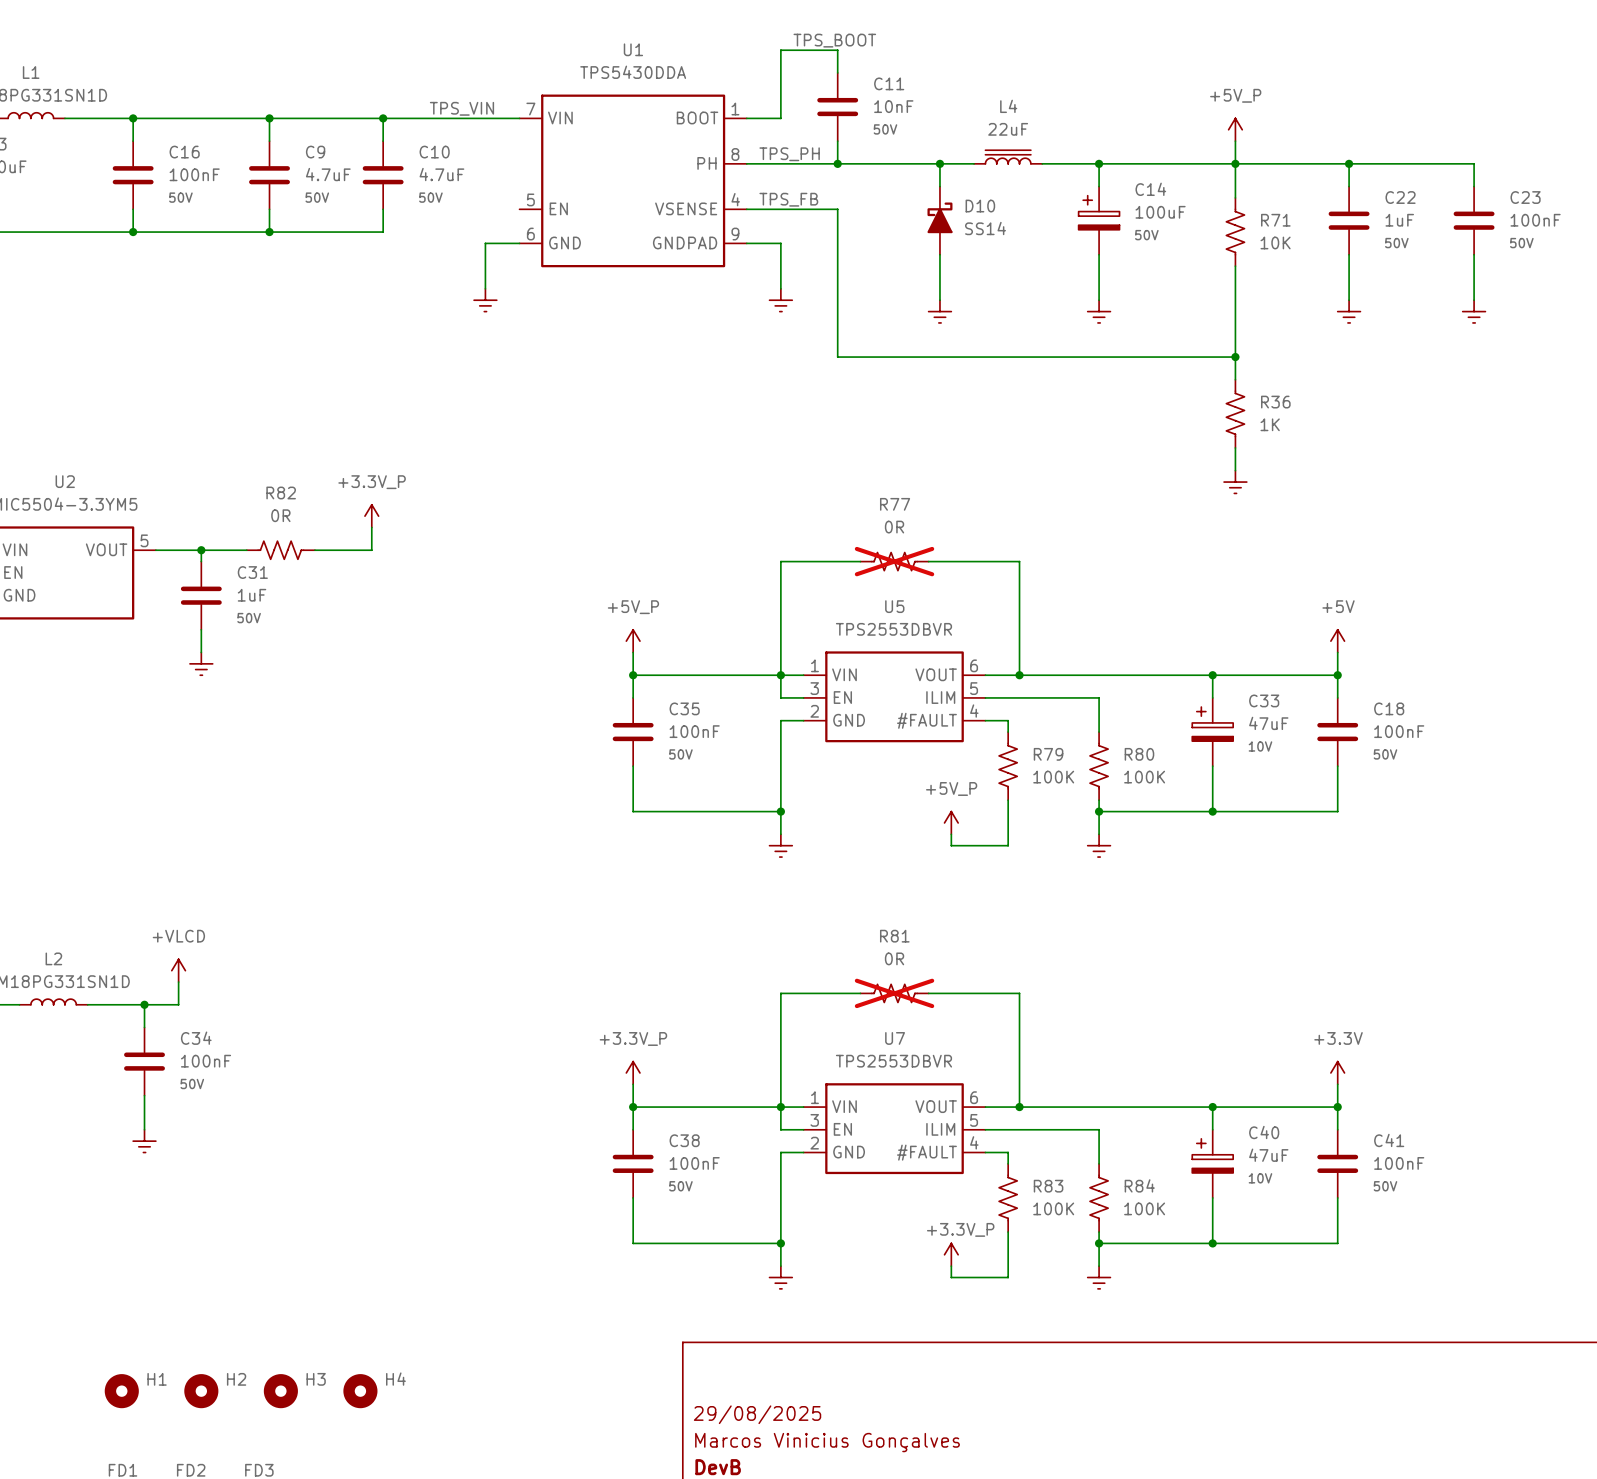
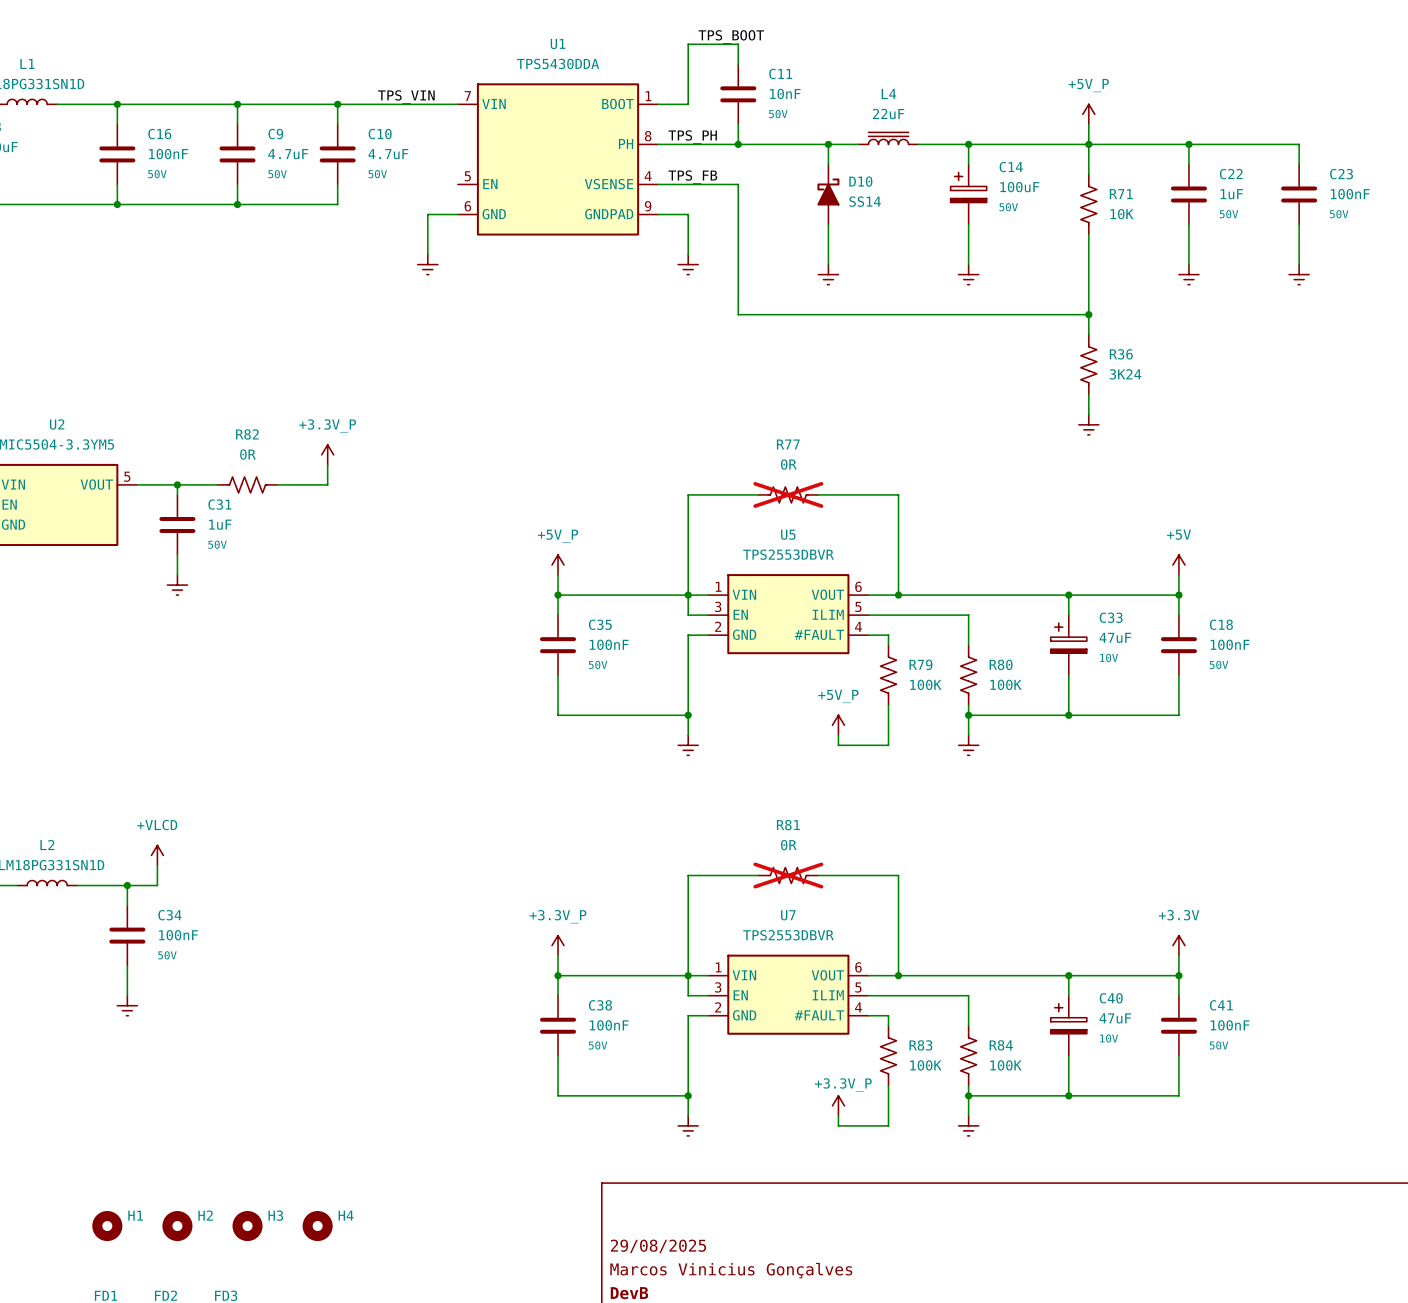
R36 value: 1K (1270, 424) -> 3K24 (1125, 374)

